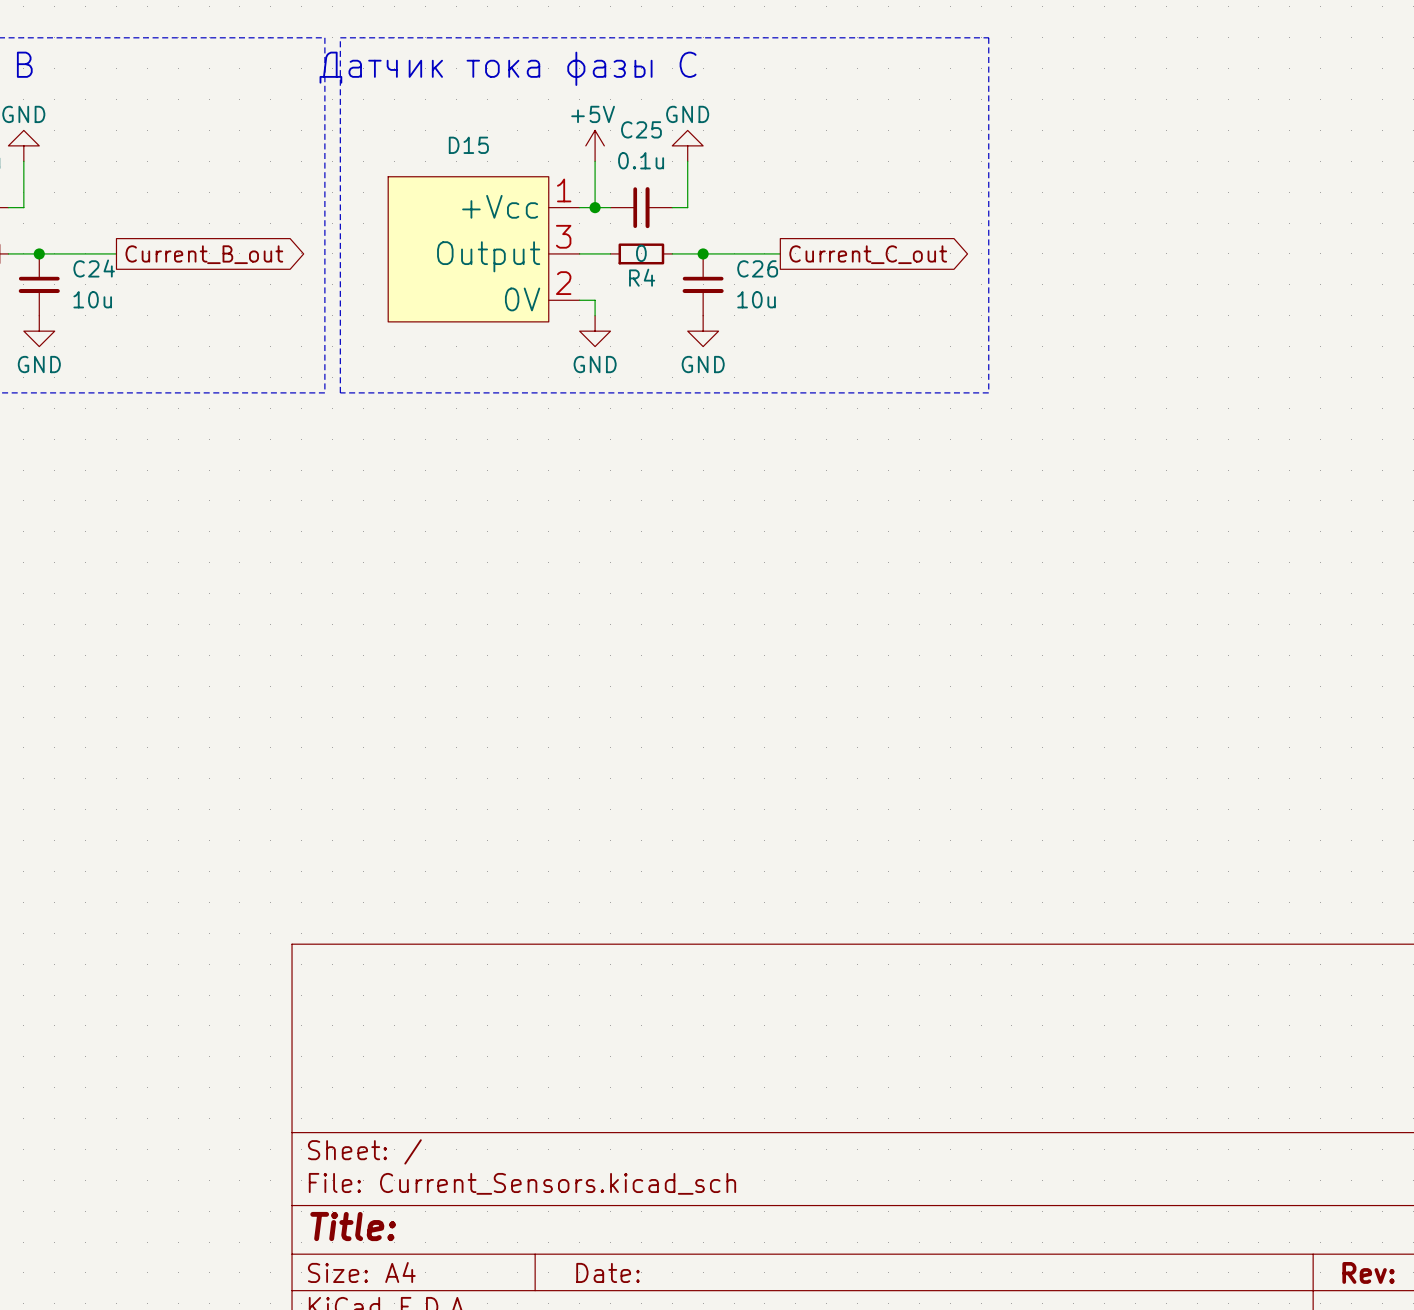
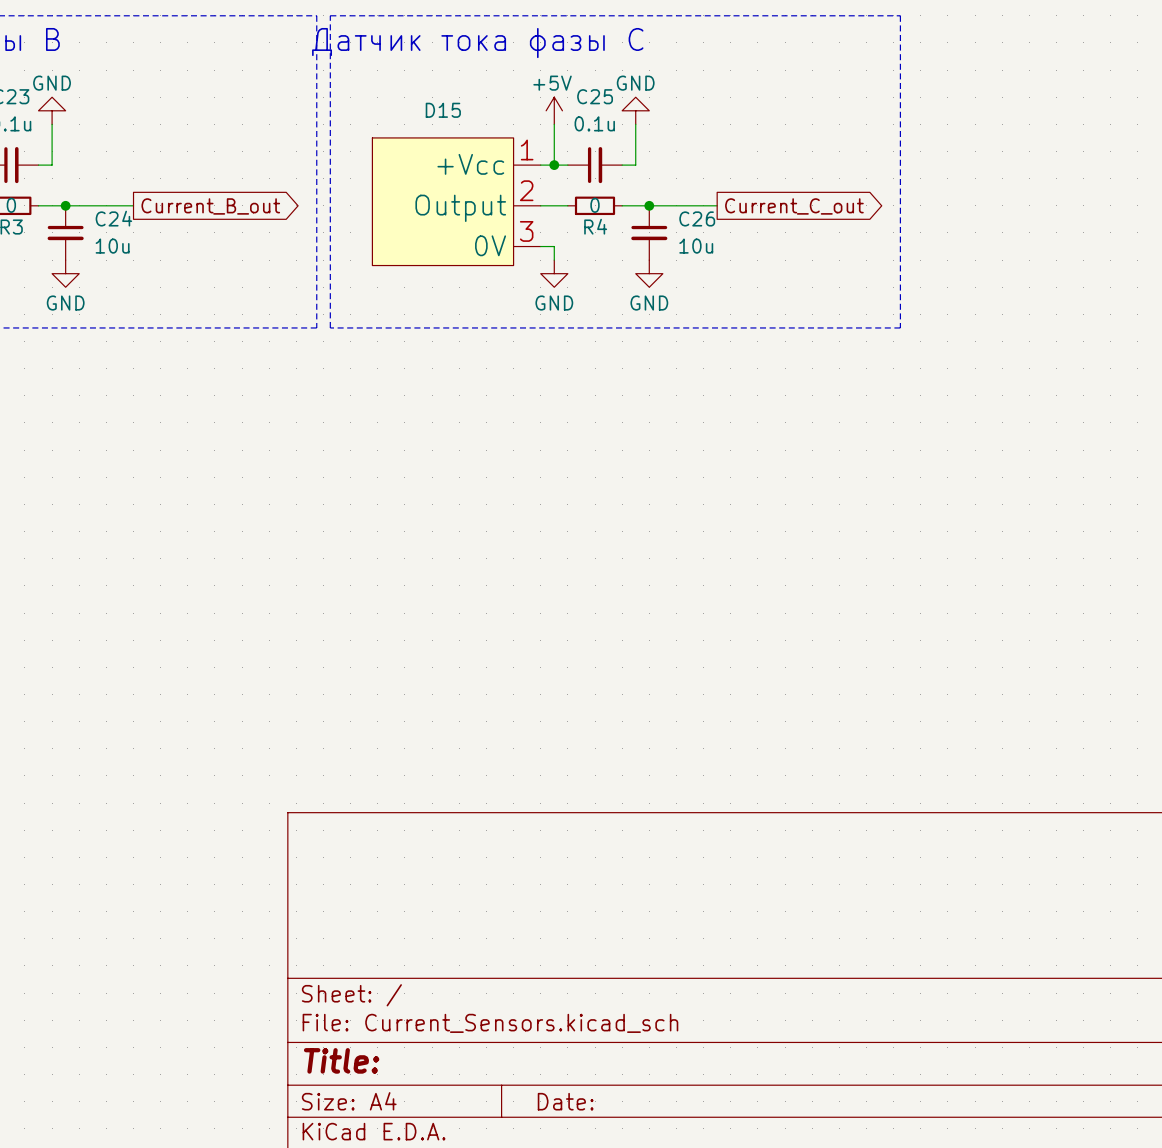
D15 pin number: 3 (563, 236) -> 2 (526, 190)
D15 pin number: 2 (563, 283) -> 3 (526, 231)

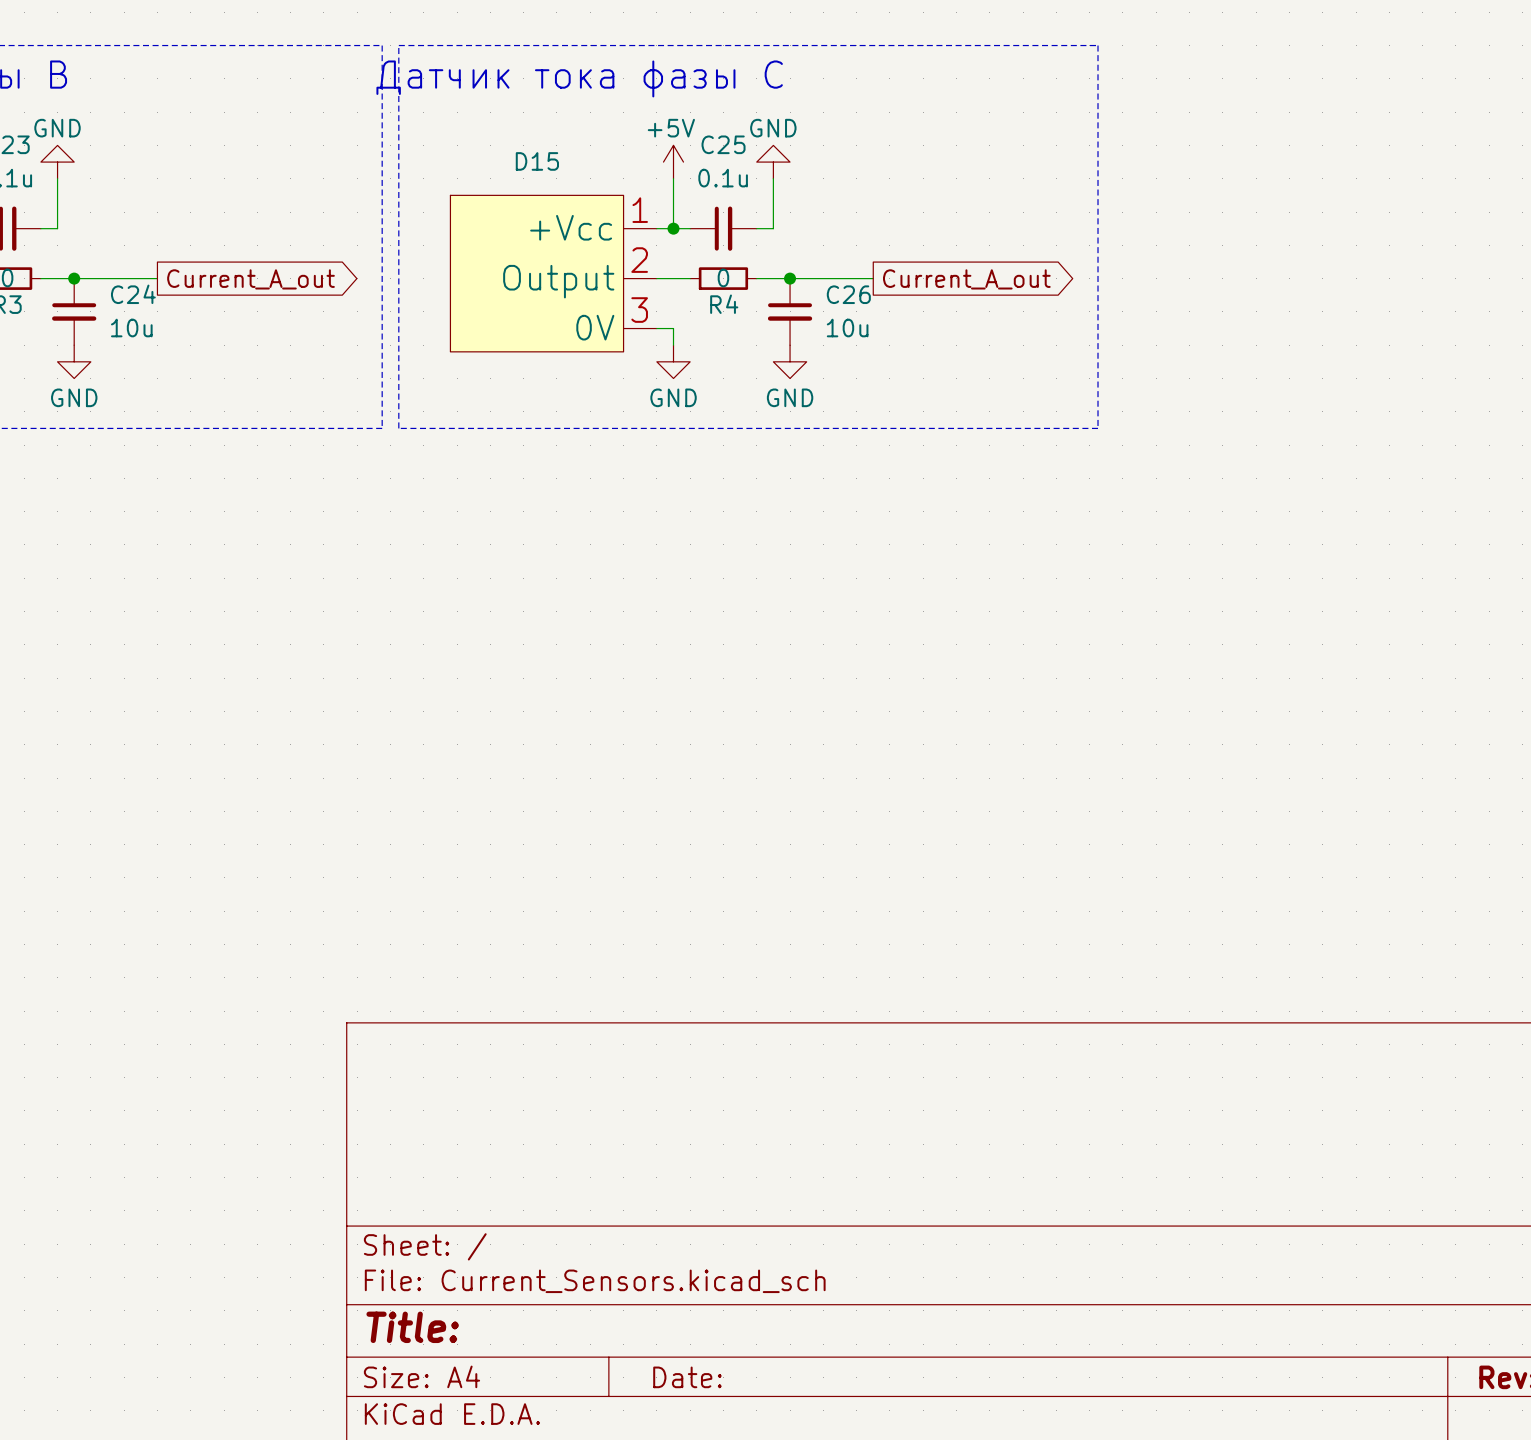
global label: Current_B_out (210, 206) -> Current_A_out (251, 279)
global label: Current_C_out (794, 206) -> Current_A_out (966, 279)

